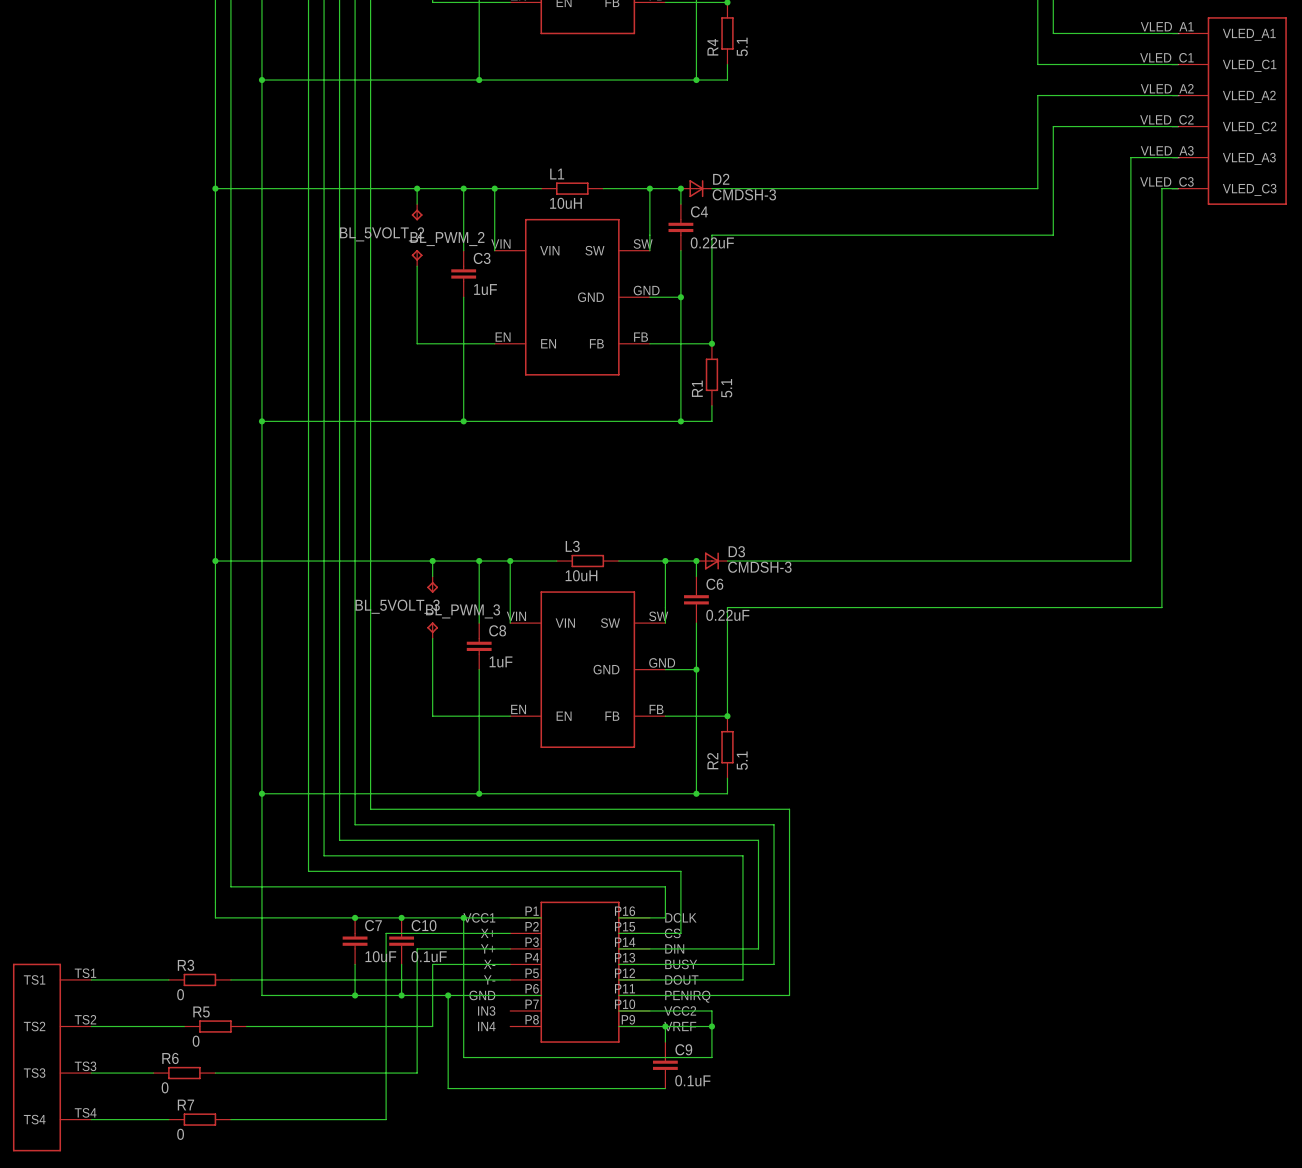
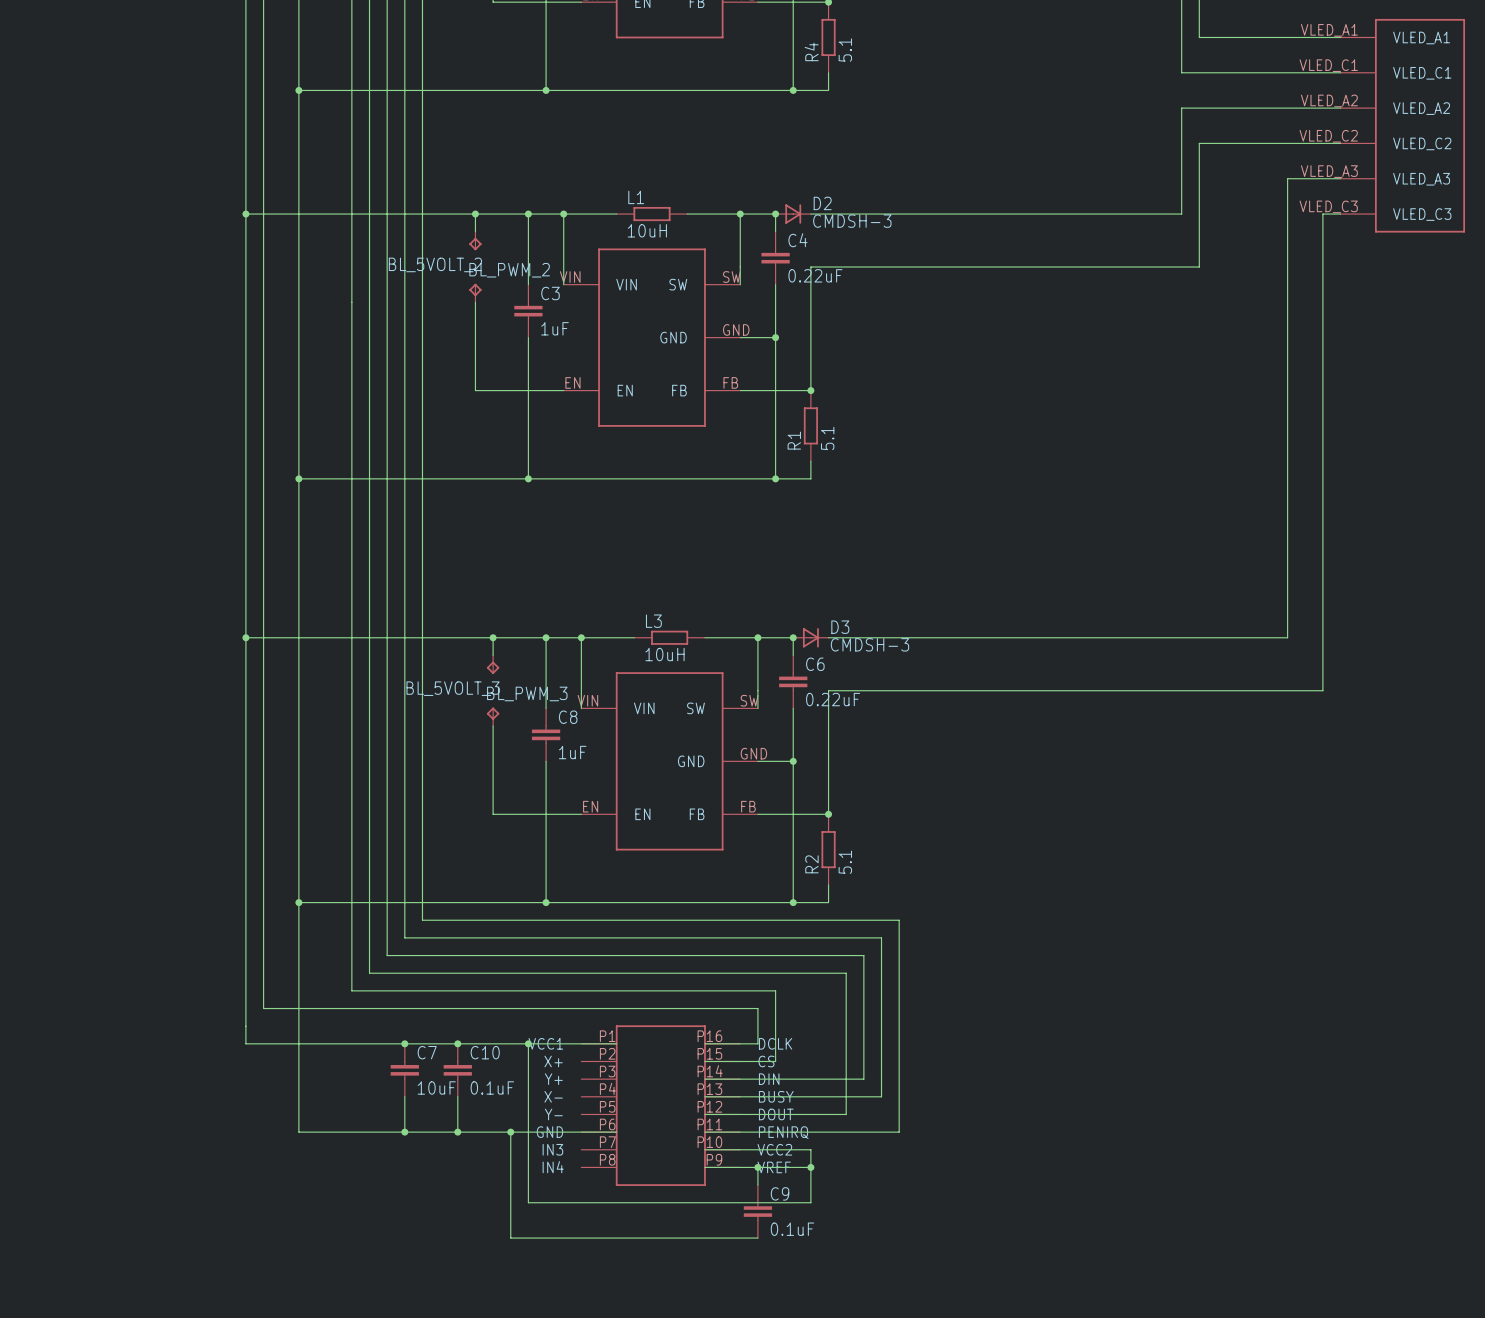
wire: (510, 933) (386, 933) (386, 1119) (230, 1119) -> none
wire: (510, 948) (417, 948) (417, 1073) (215, 1073) -> none
wire: (510, 964) (432, 964) (432, 1026) (246, 1026) -> none
wire: (91, 979) (168, 979) -> none
R3: 0 (199, 979) -> none
wire: (230, 979) (510, 979) -> none
wire: (91, 1026) (184, 1026) -> none
R5: 0 (215, 1026) -> none
part: (52, 1057) -> none
wire: (91, 1073) (153, 1073) -> none
R6: 0 (184, 1073) -> none
wire: (91, 1119) (168, 1119) -> none
R7: 0 (199, 1119) -> none

